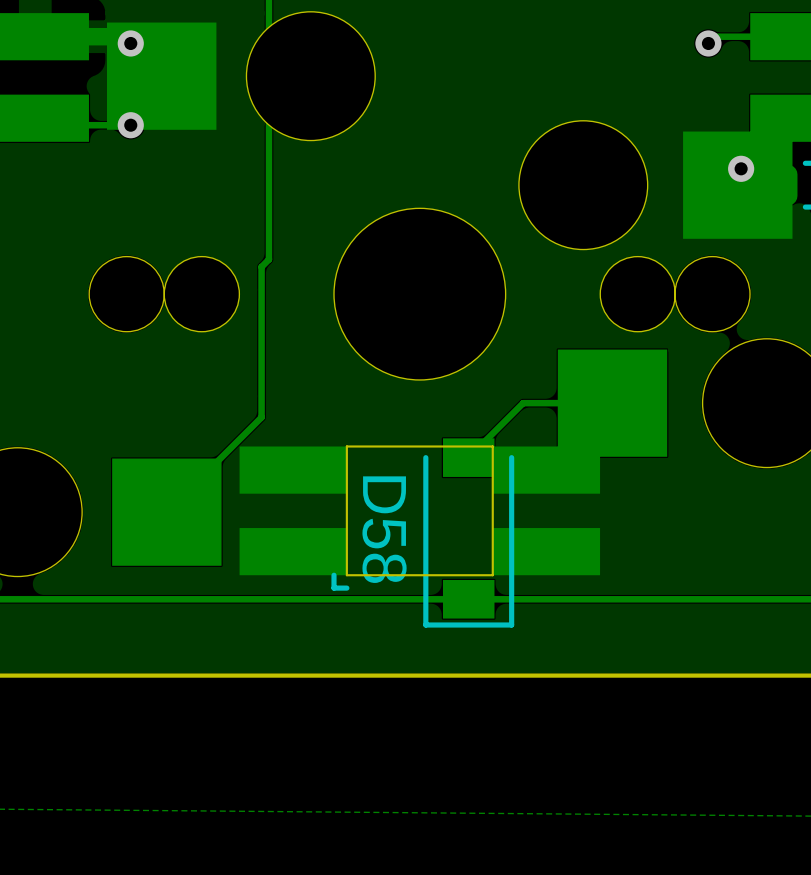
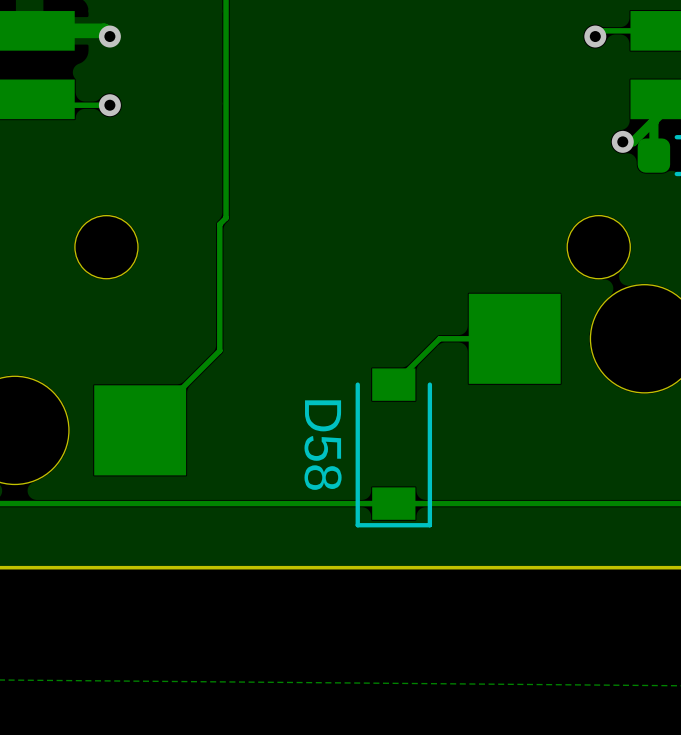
part: (449, 301) -> none

